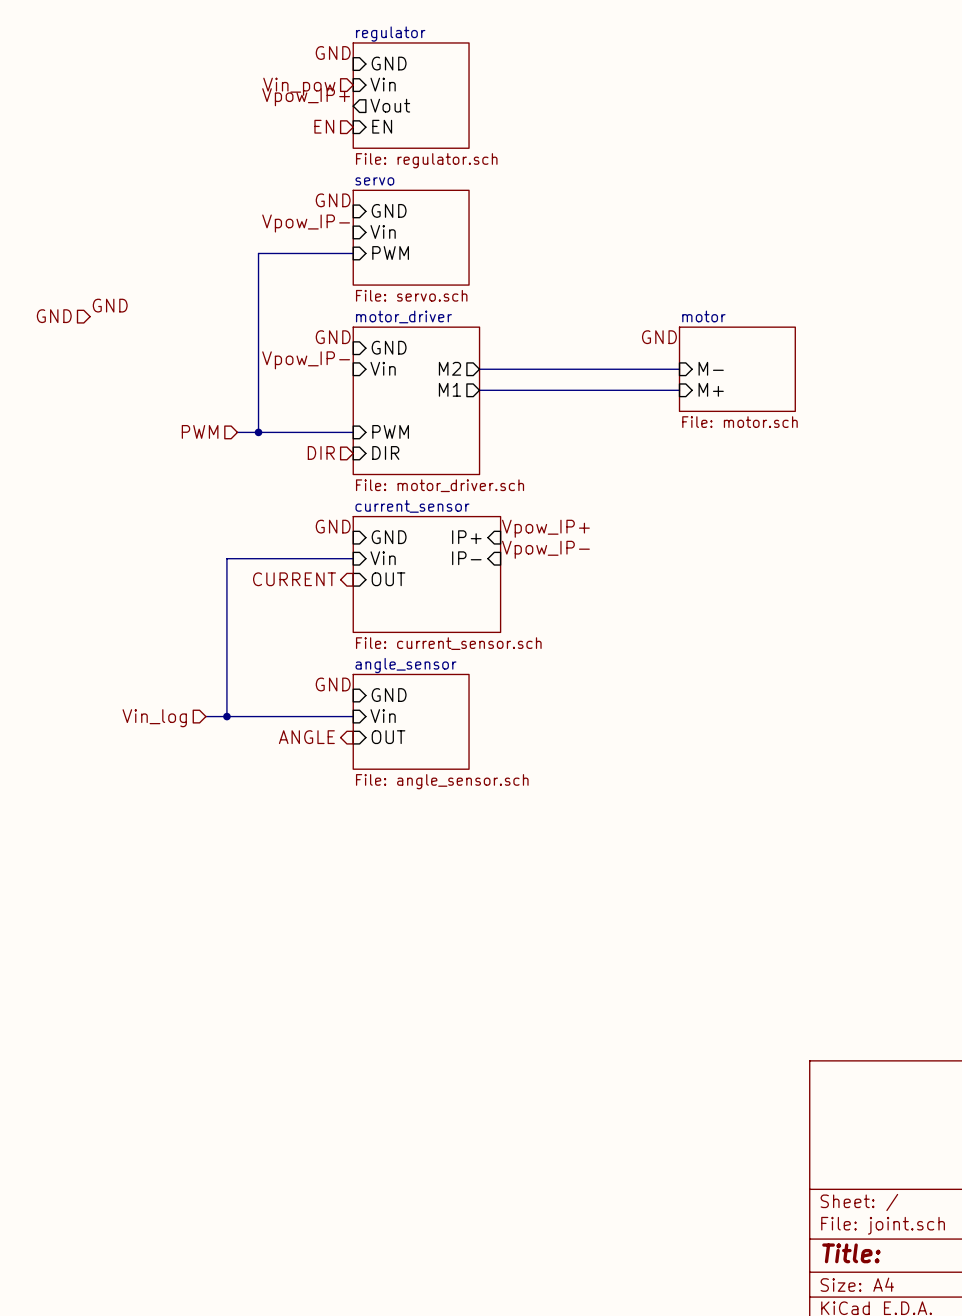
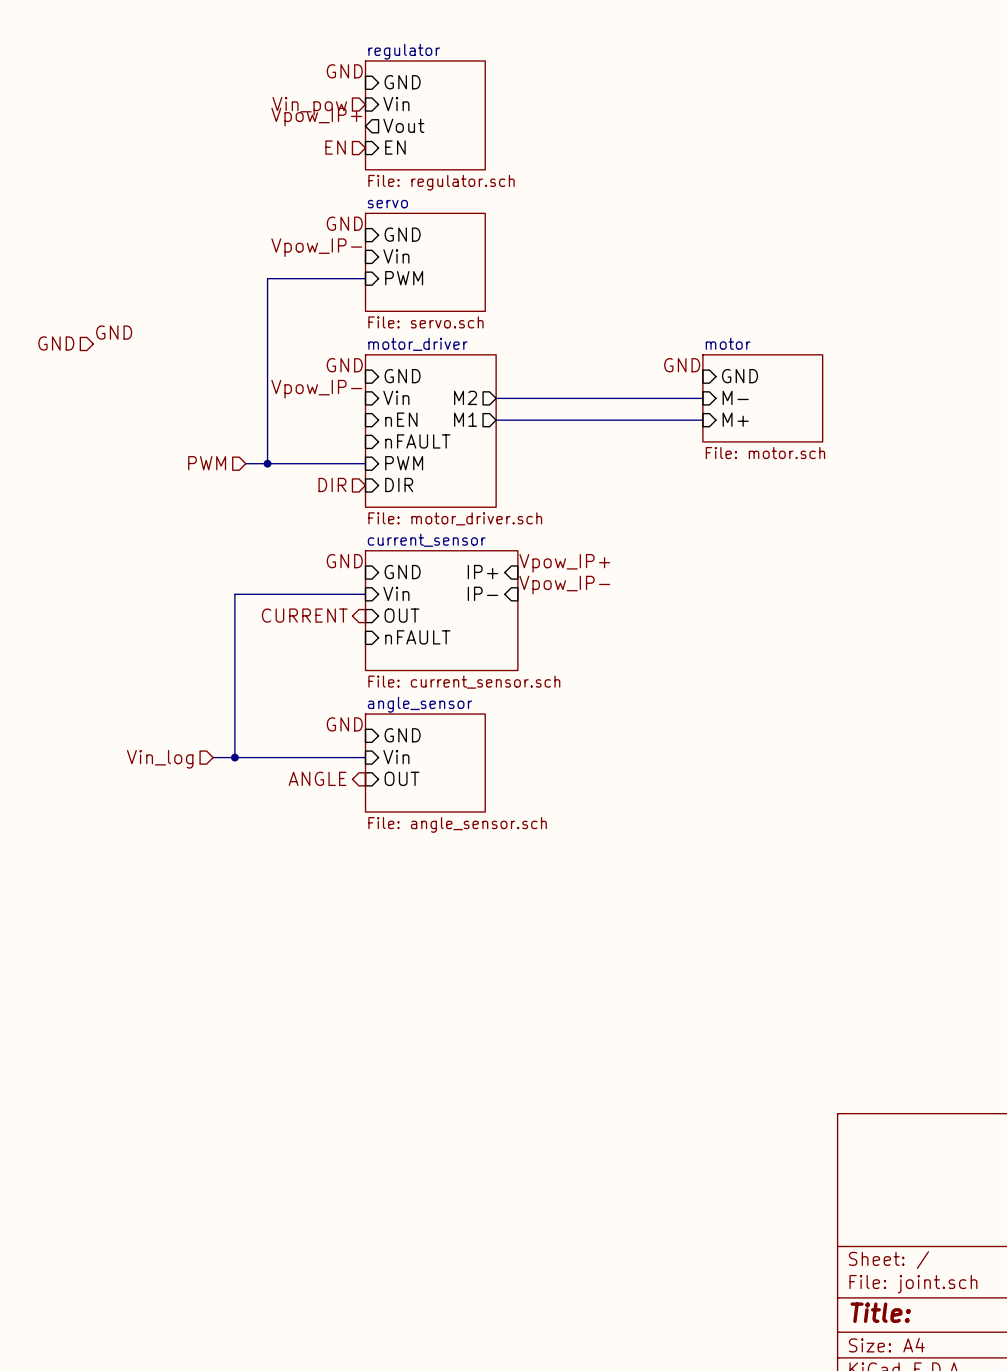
sheet pin: none -> GND (740, 376)
sheet pin: none -> nEN (401, 419)
sheet pin: none -> nFAULT (417, 441)
sheet pin: none -> nFAULT (417, 637)

